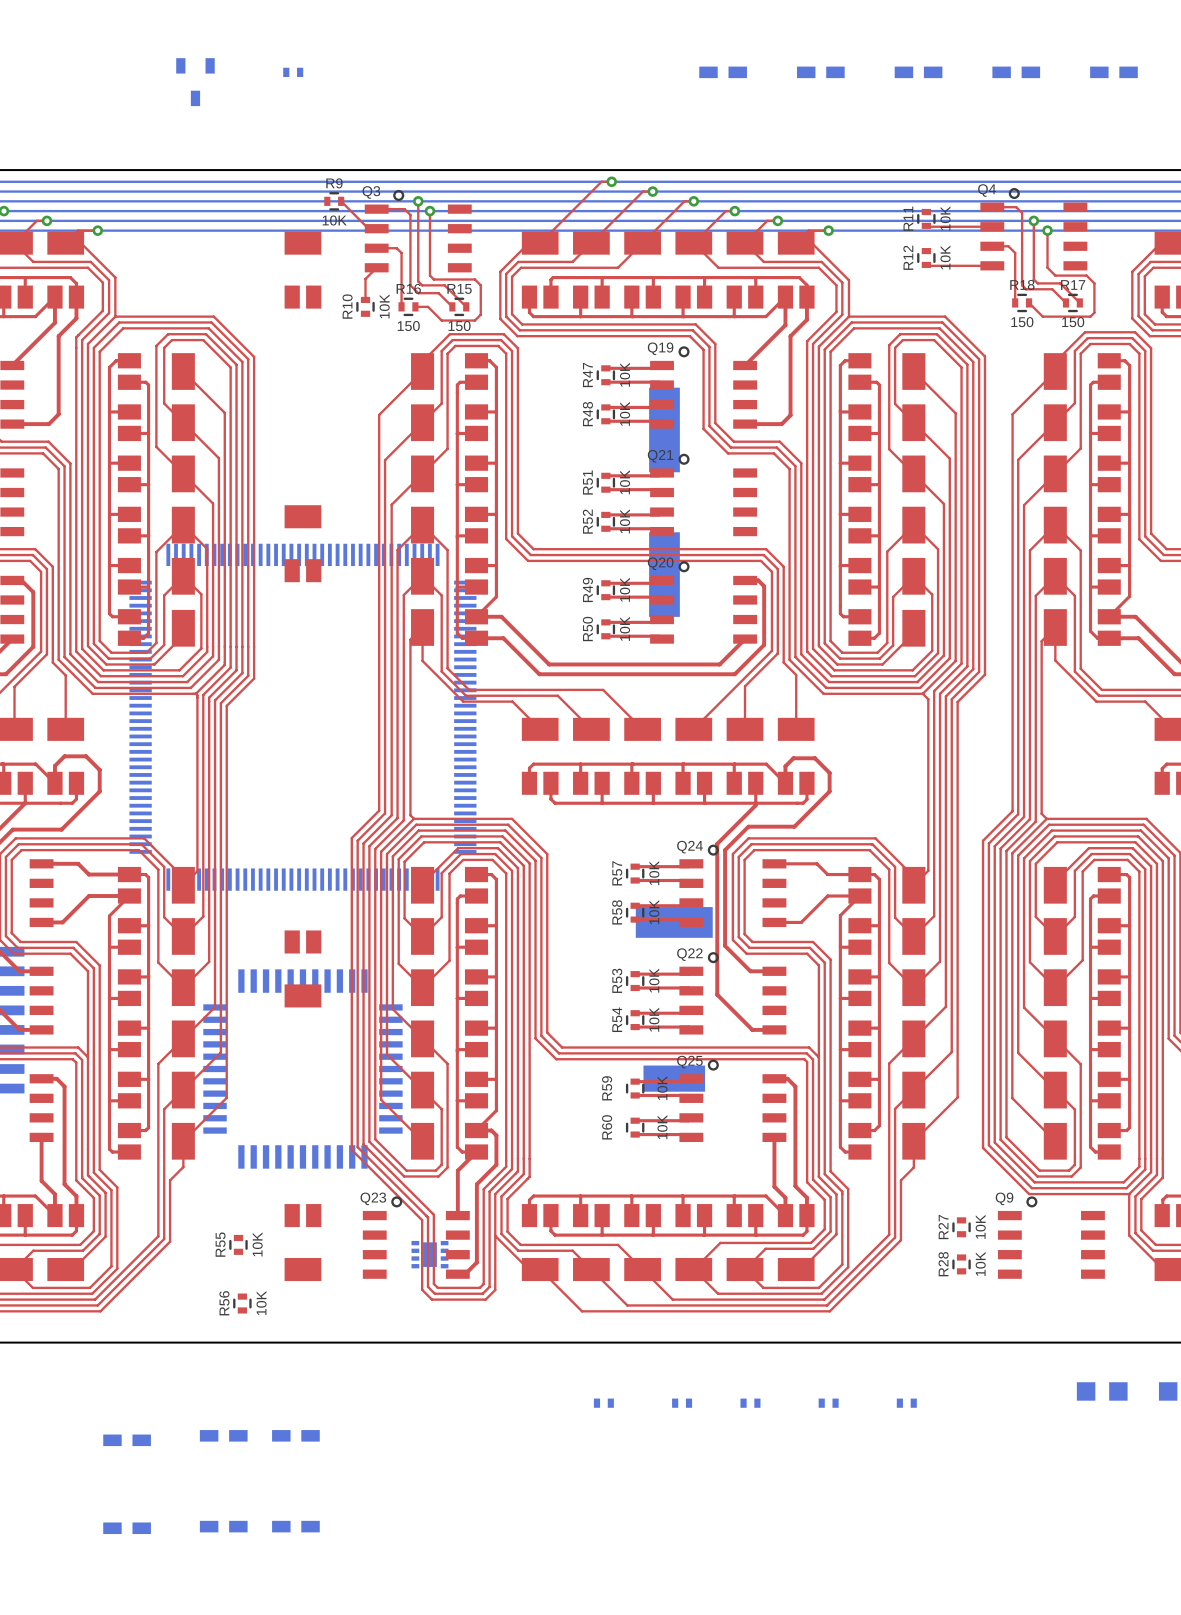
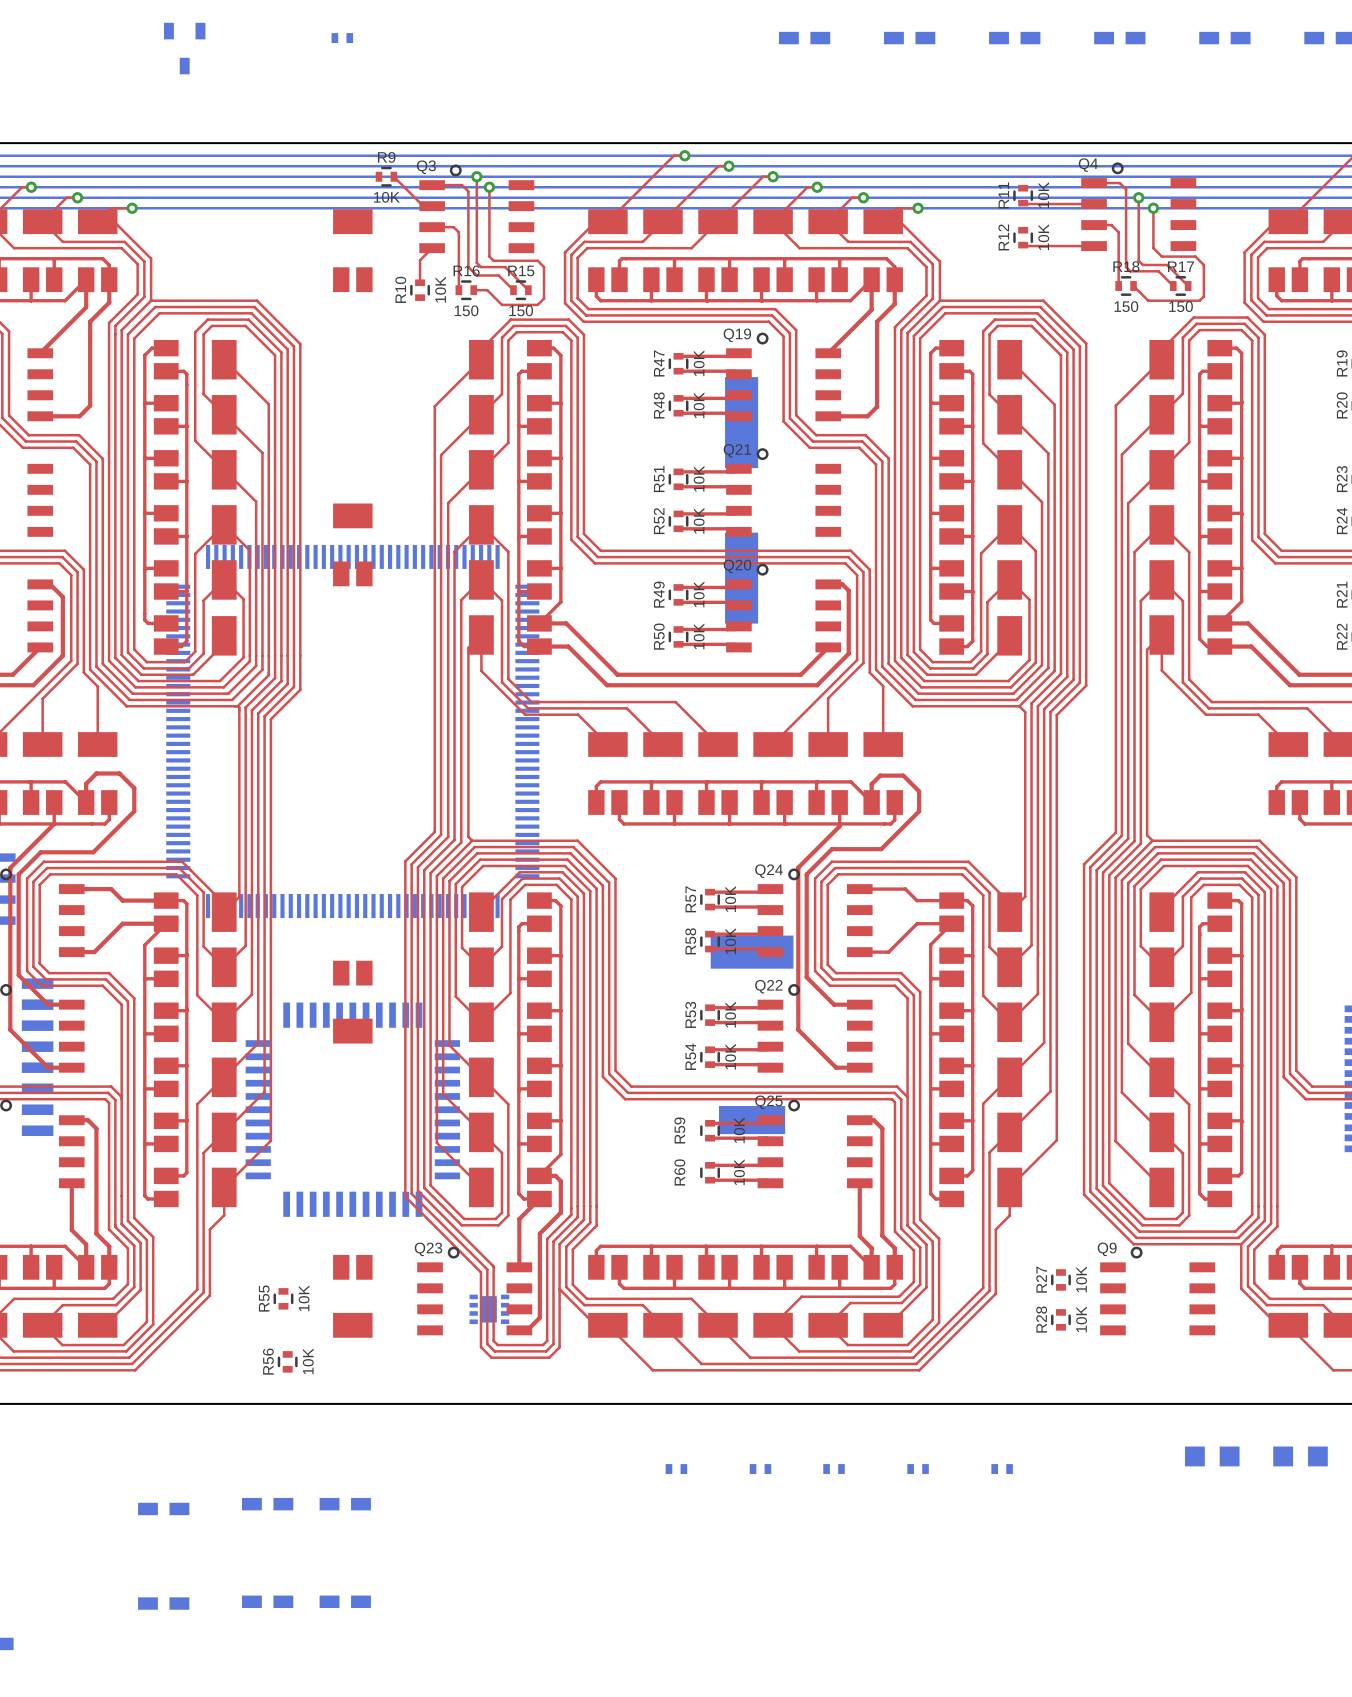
part position: (195, 82) -> (184, 48)

